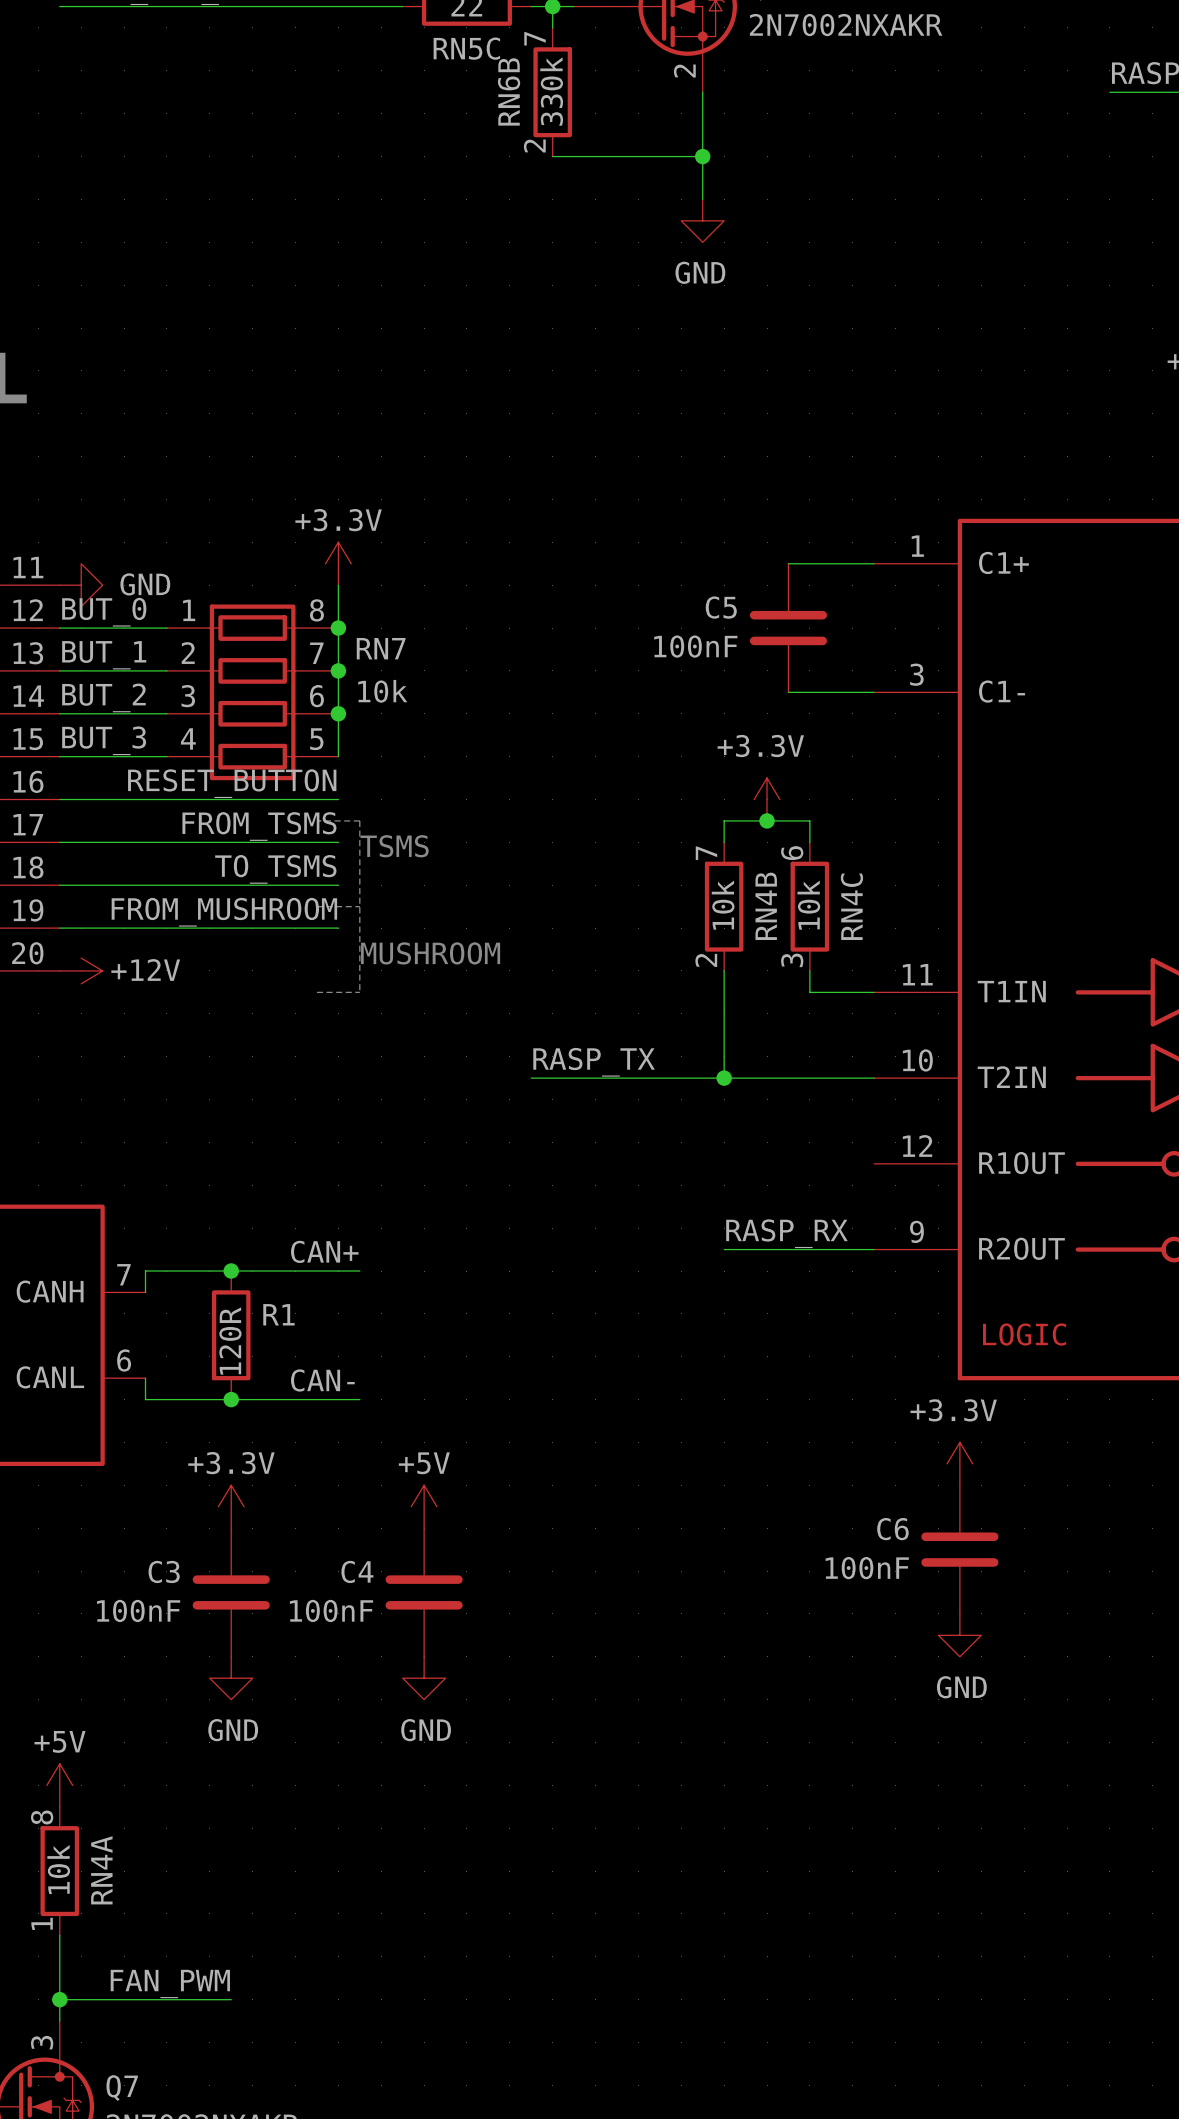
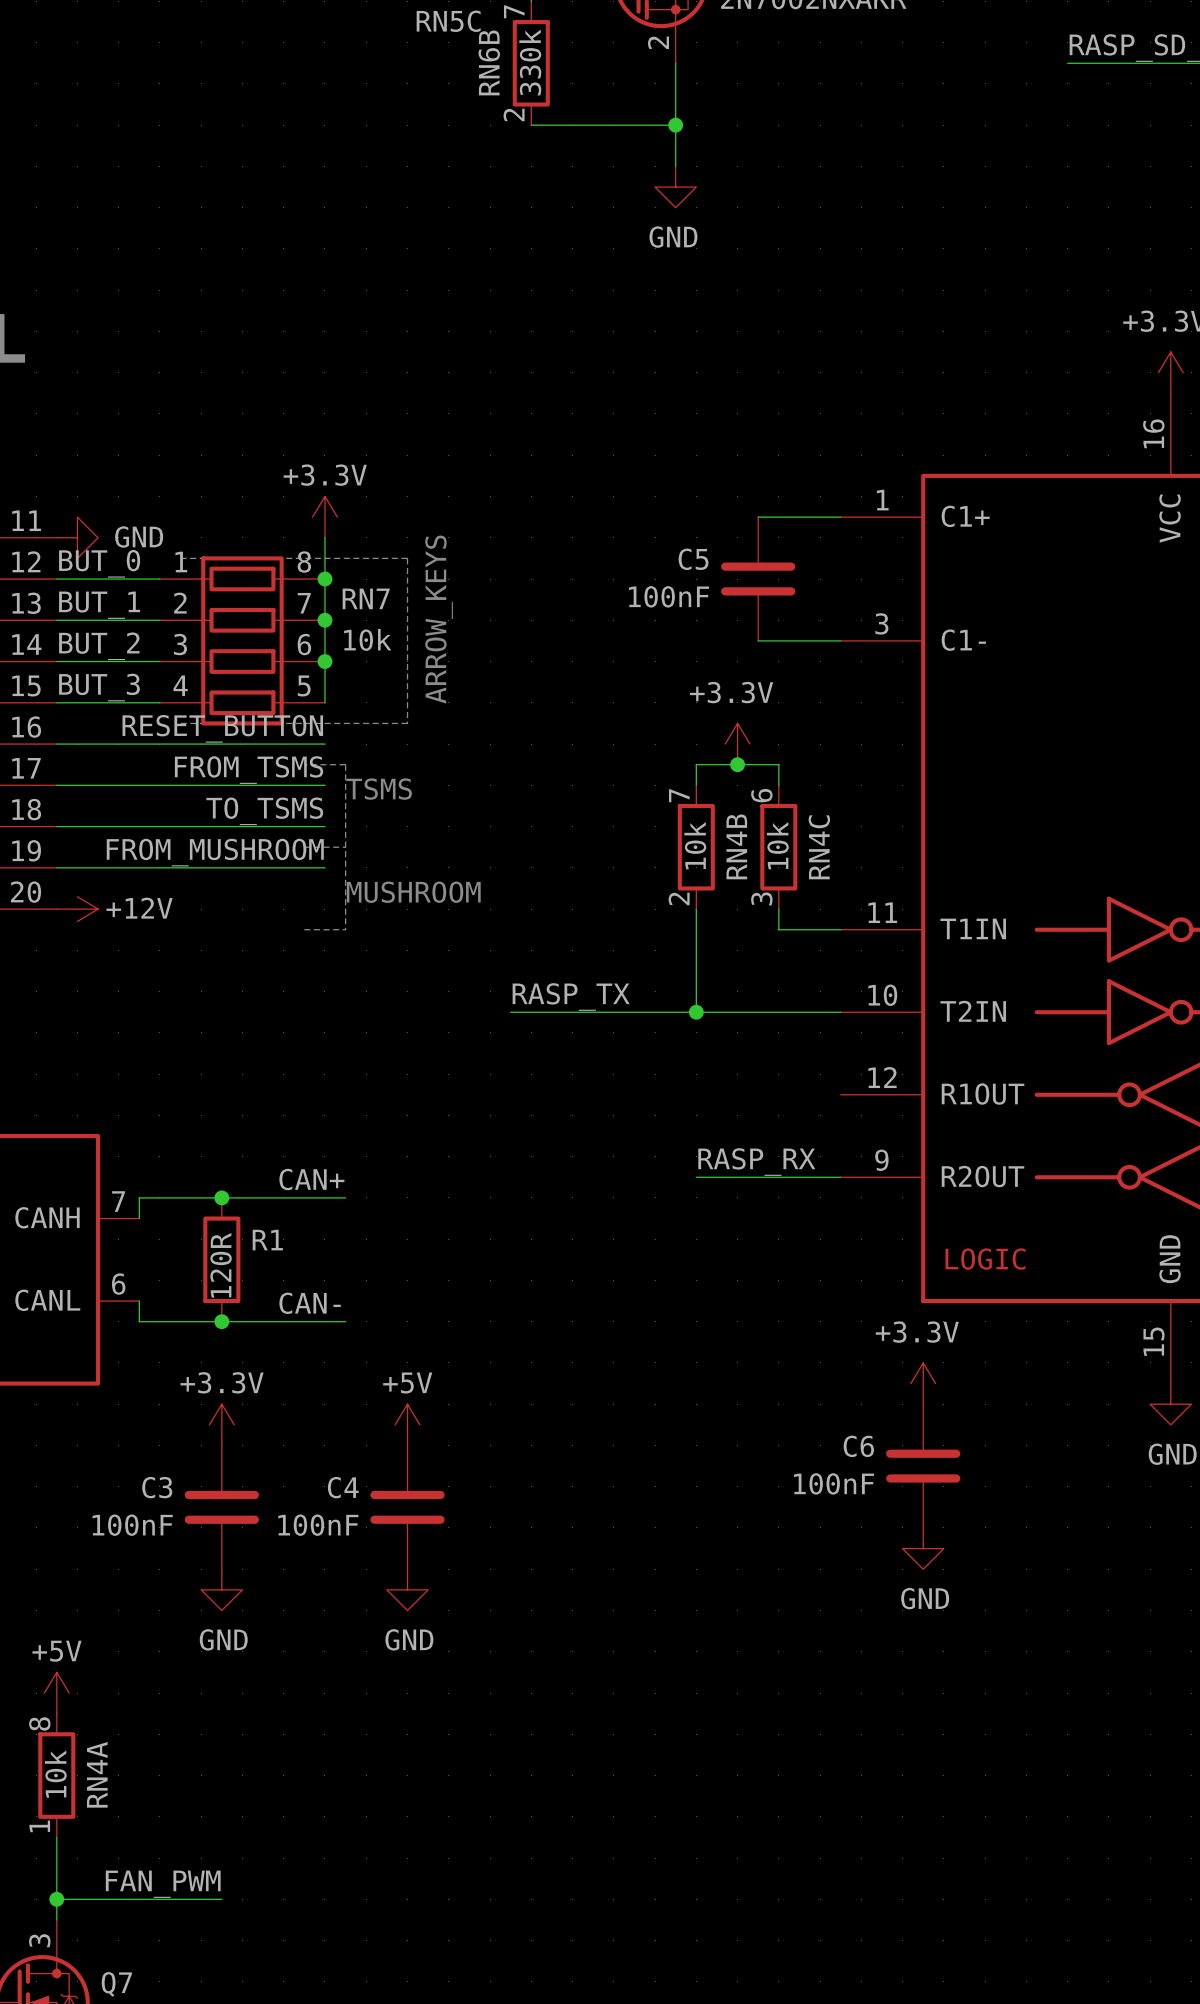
line: none -> (180, 558) (407, 558) (407, 723) (180, 723)
text: none -> ARROW_KEYS (439, 619)

